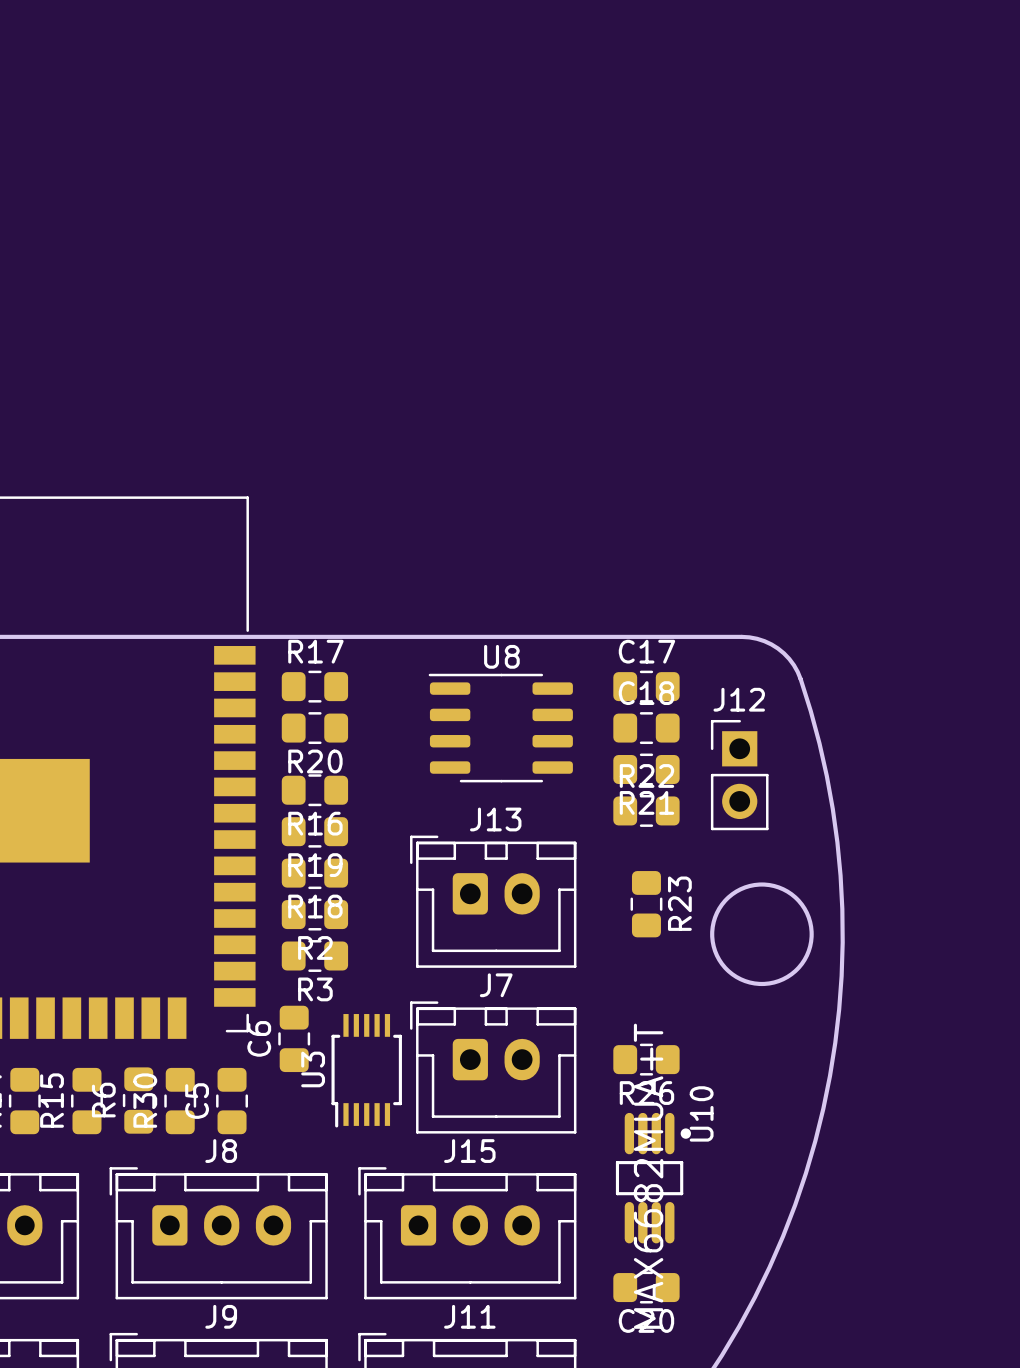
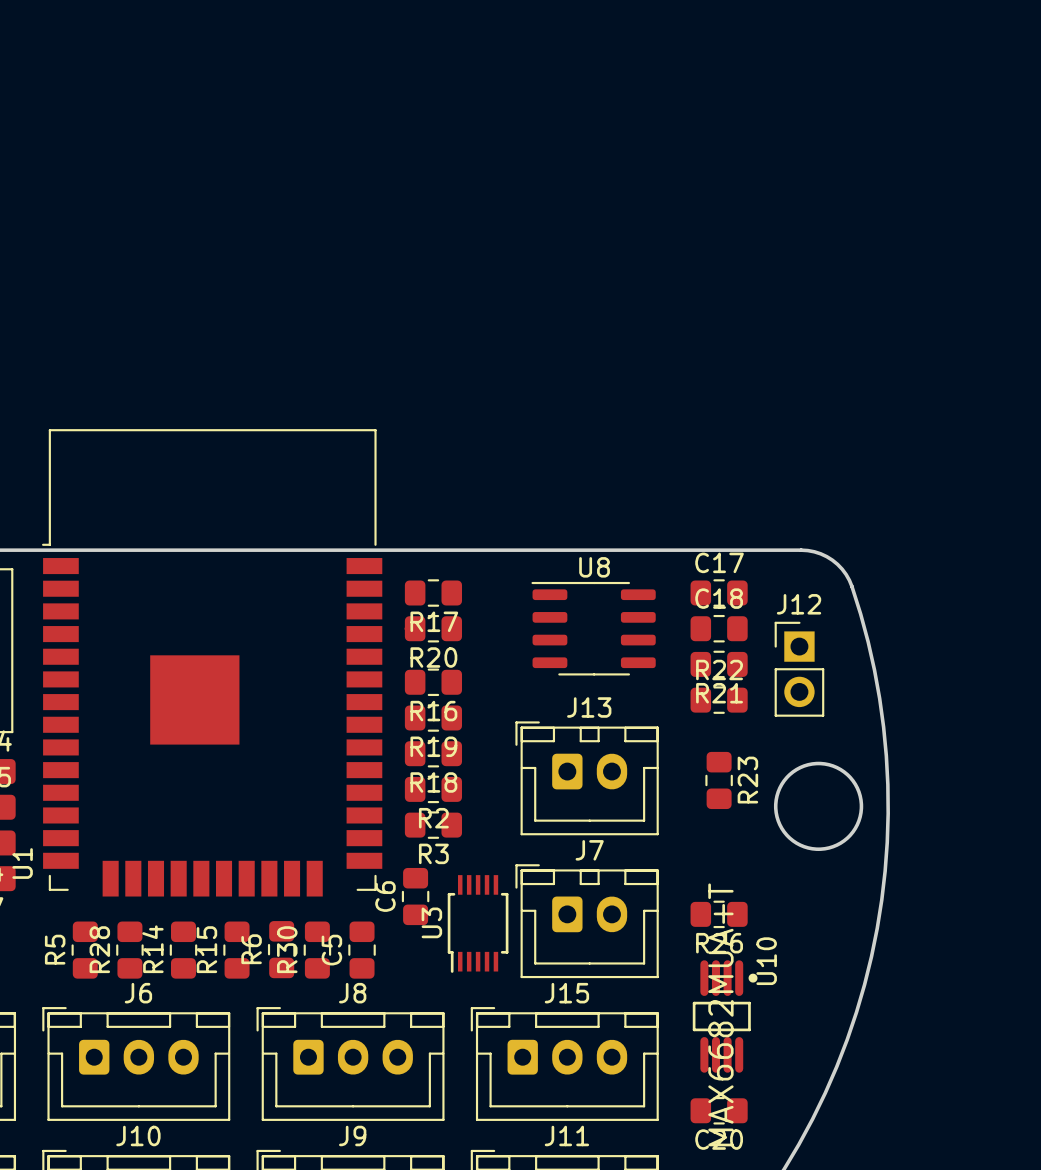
R17 name position: R17 (315, 651) -> R17 (434, 621)

